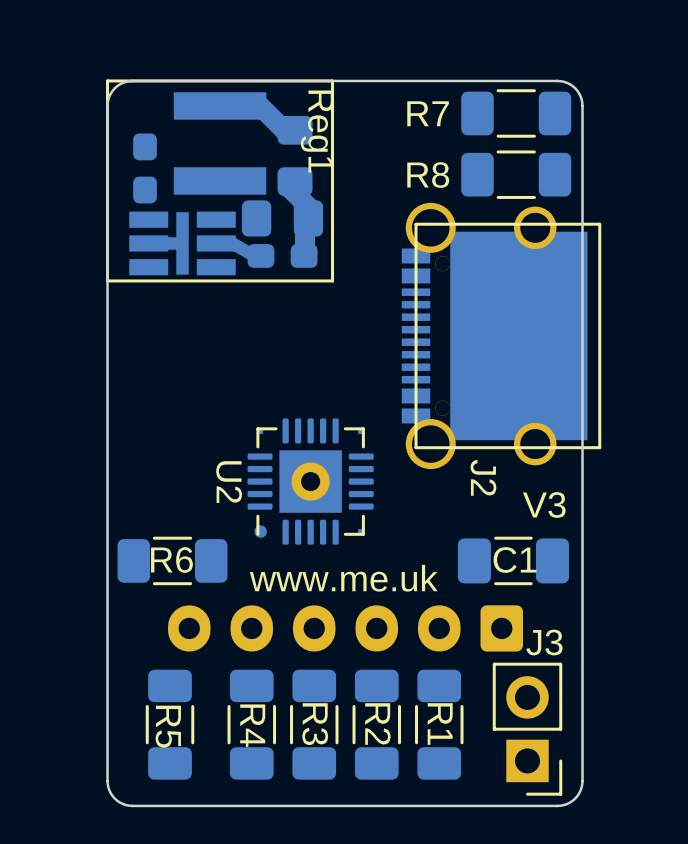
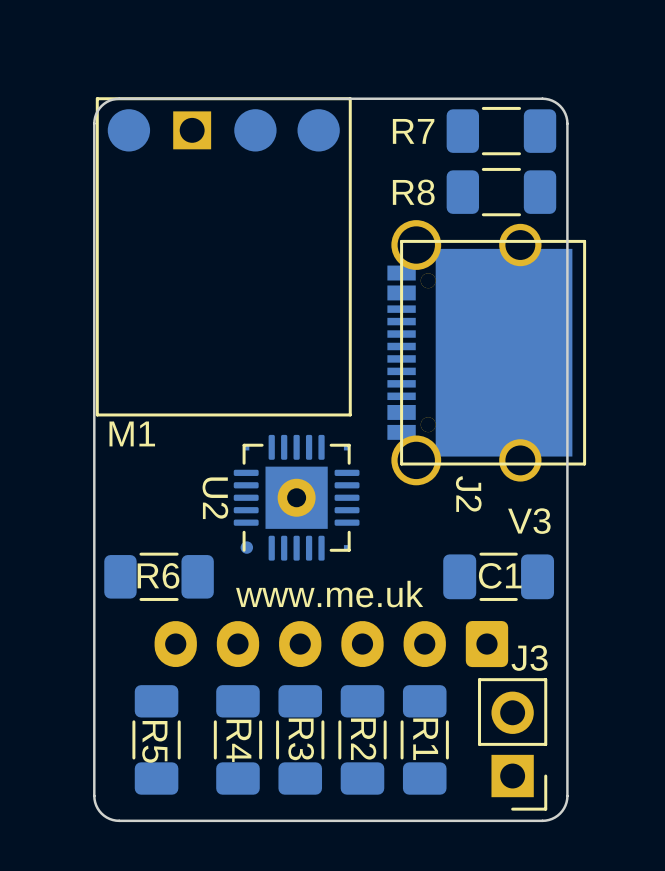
Reg1: (220, 180) -> none
M1: none -> (223, 256)

